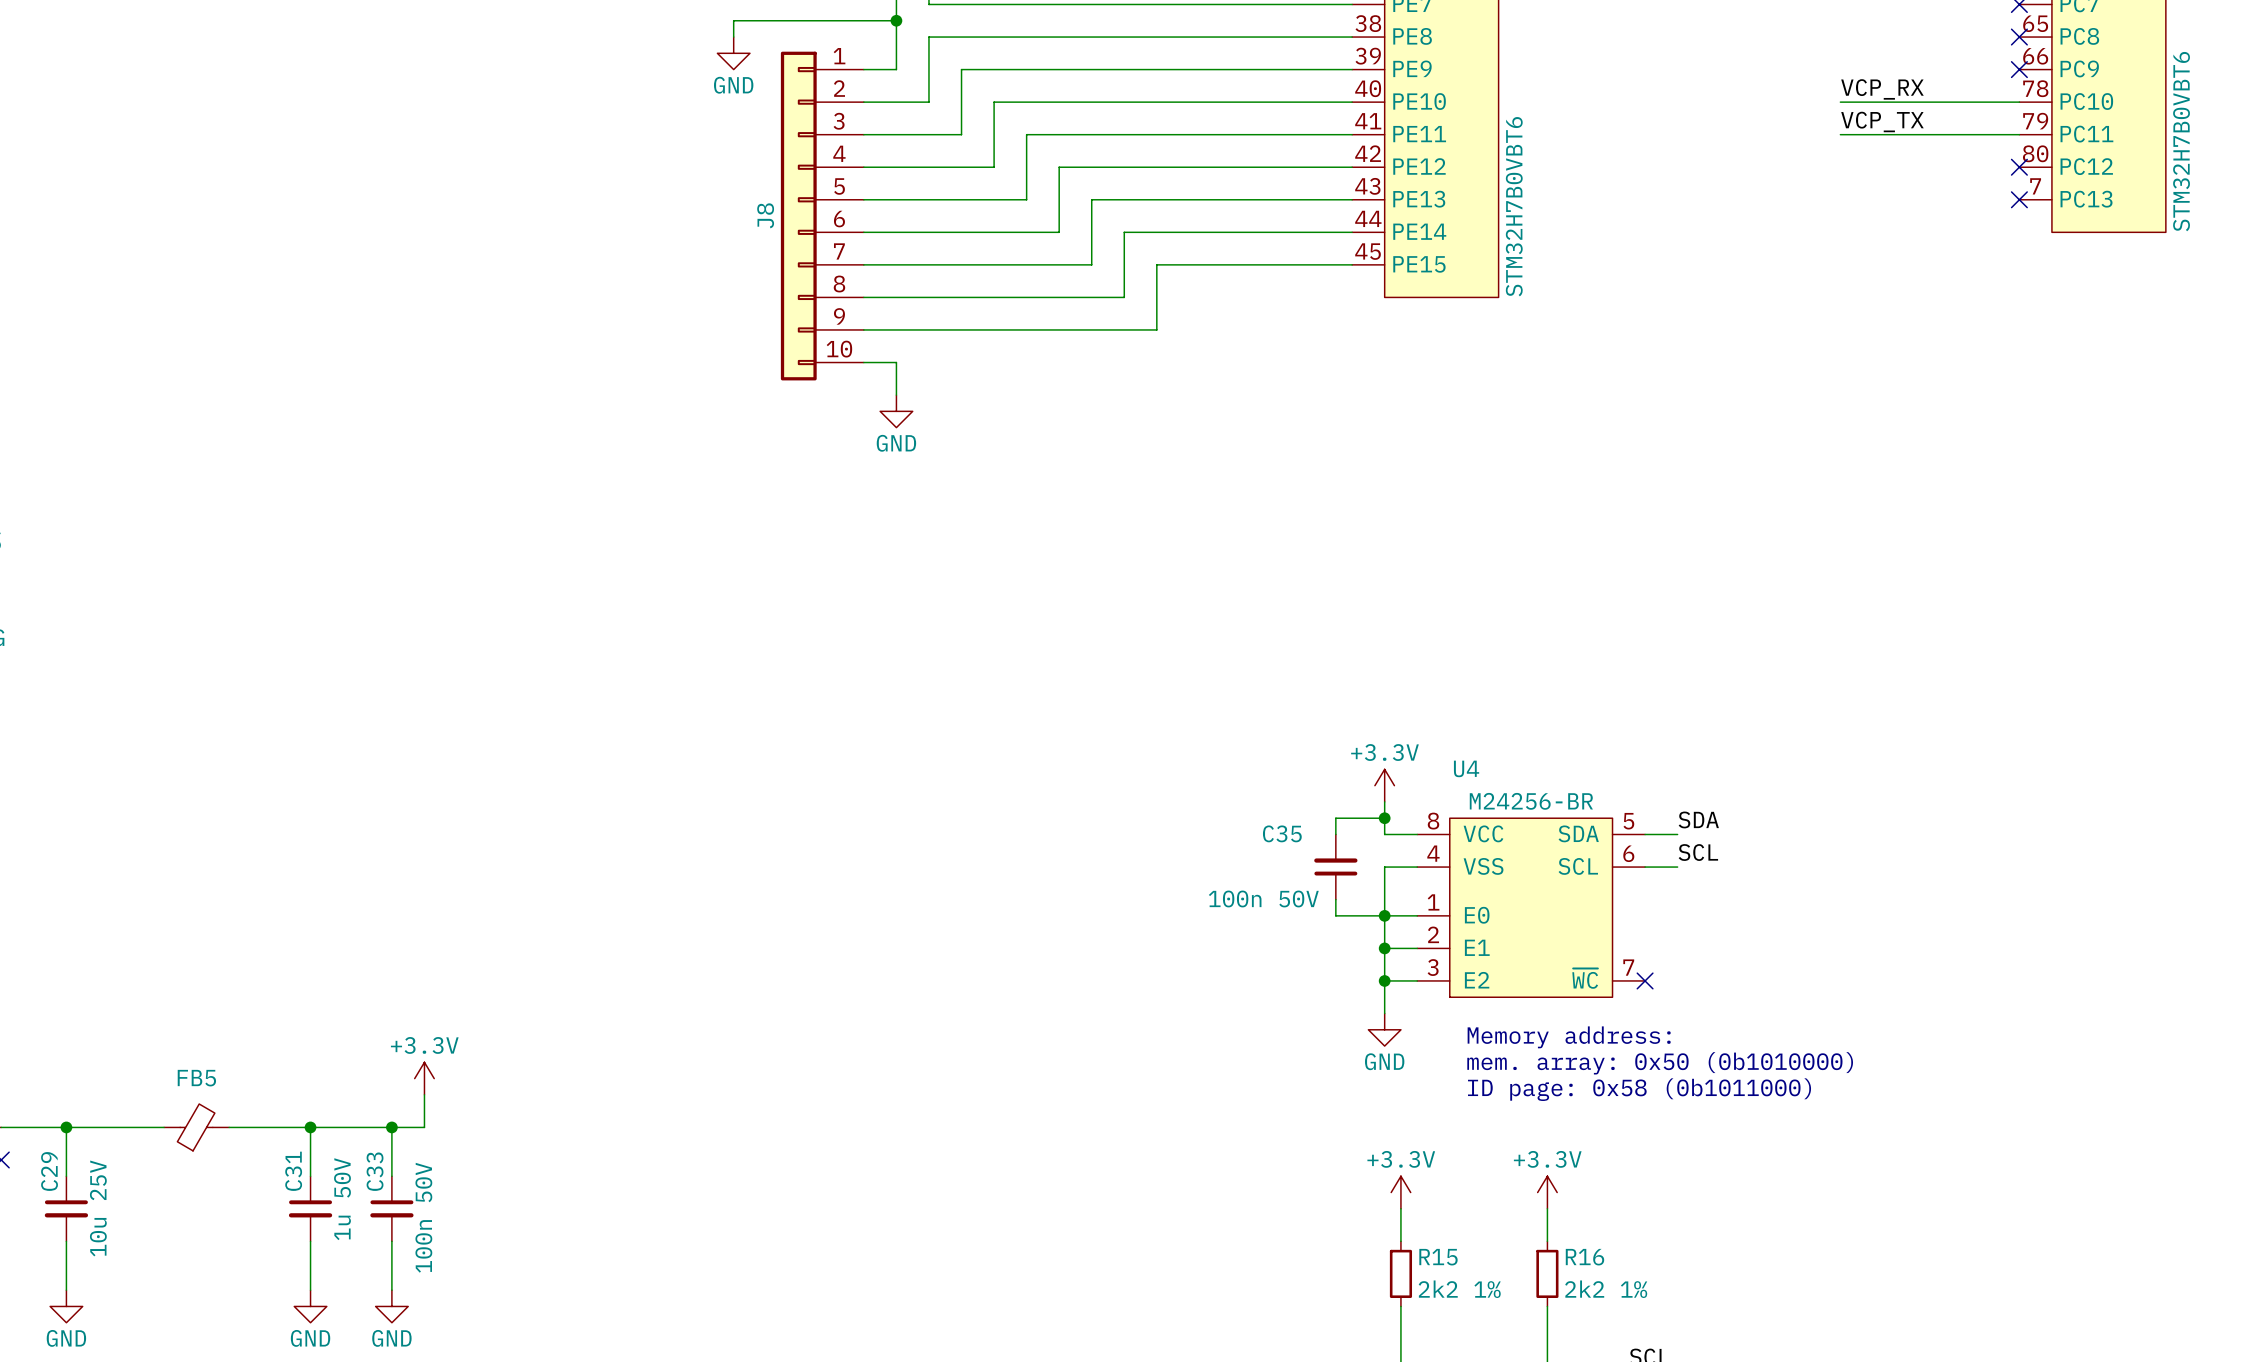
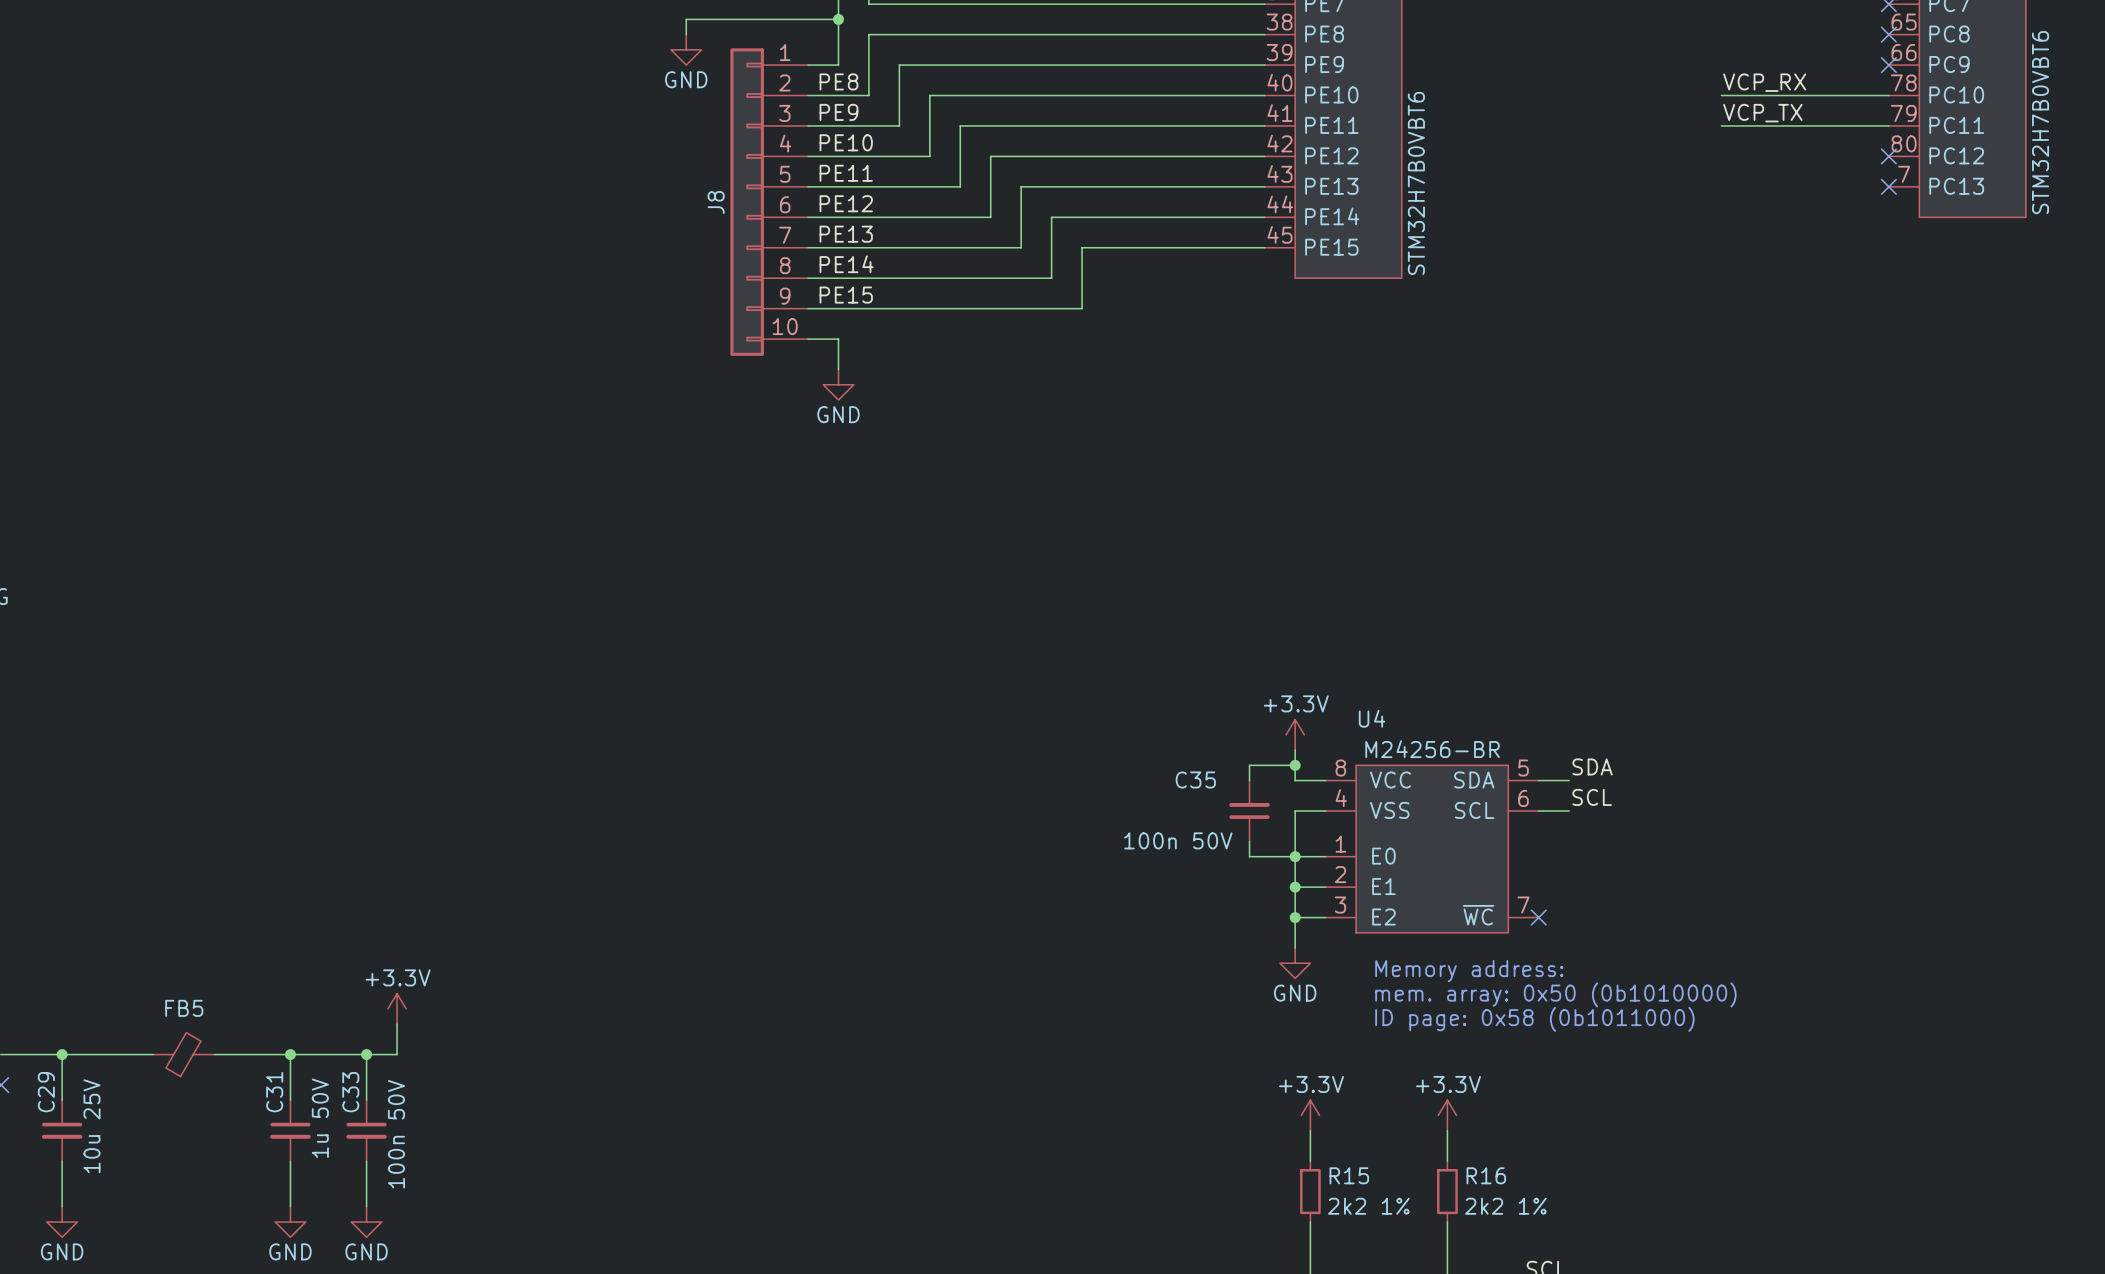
label: none -> PE8 (838, 81)
label: none -> PE9 (838, 112)
label: none -> PE10 (846, 142)
label: none -> PE11 (846, 173)
label: none -> PE12 (846, 203)
label: none -> PE13 (846, 234)
label: none -> PE14 (846, 264)
label: none -> PE15 (846, 295)

